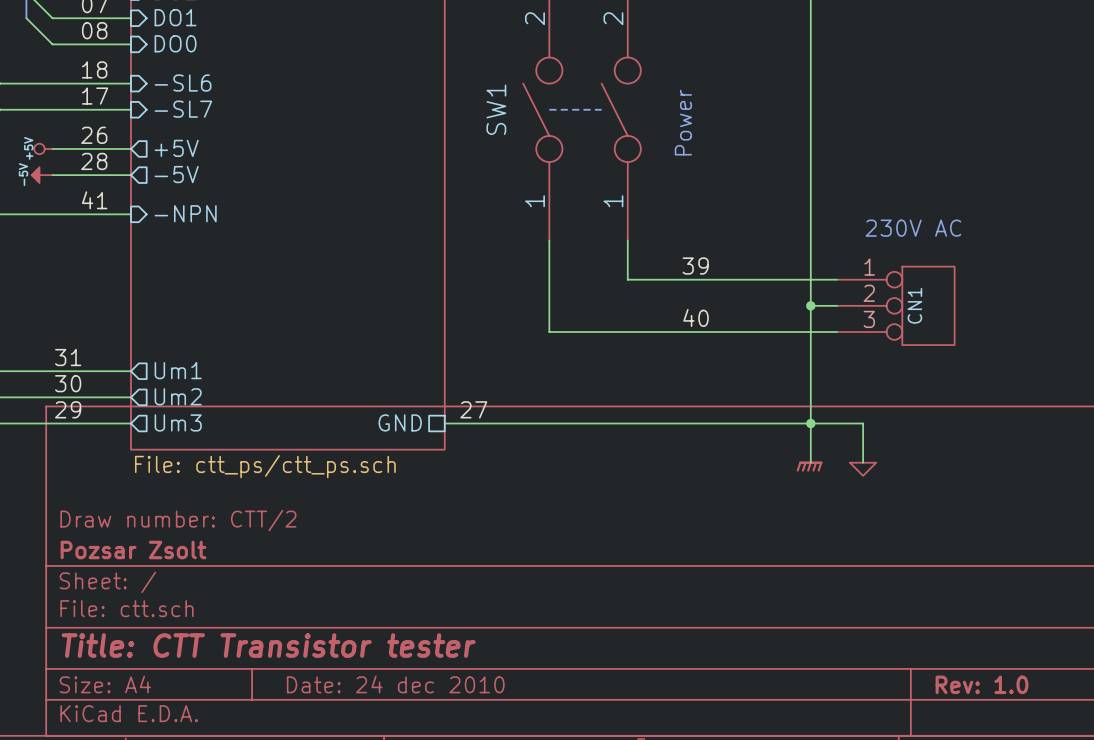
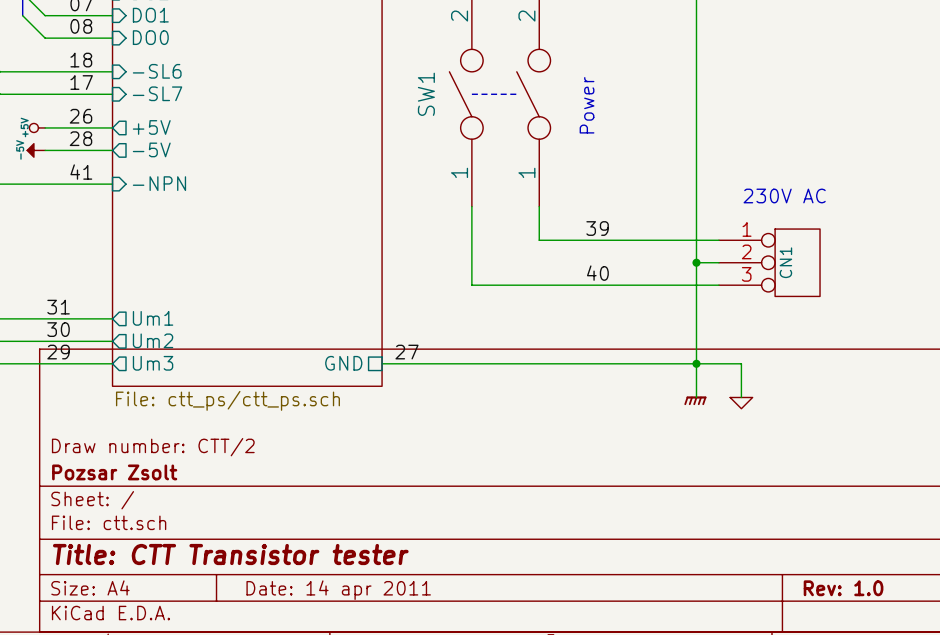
title block: Date: 24 dec 2010 (395, 684) -> Date: 14 apr 2011 (338, 590)

